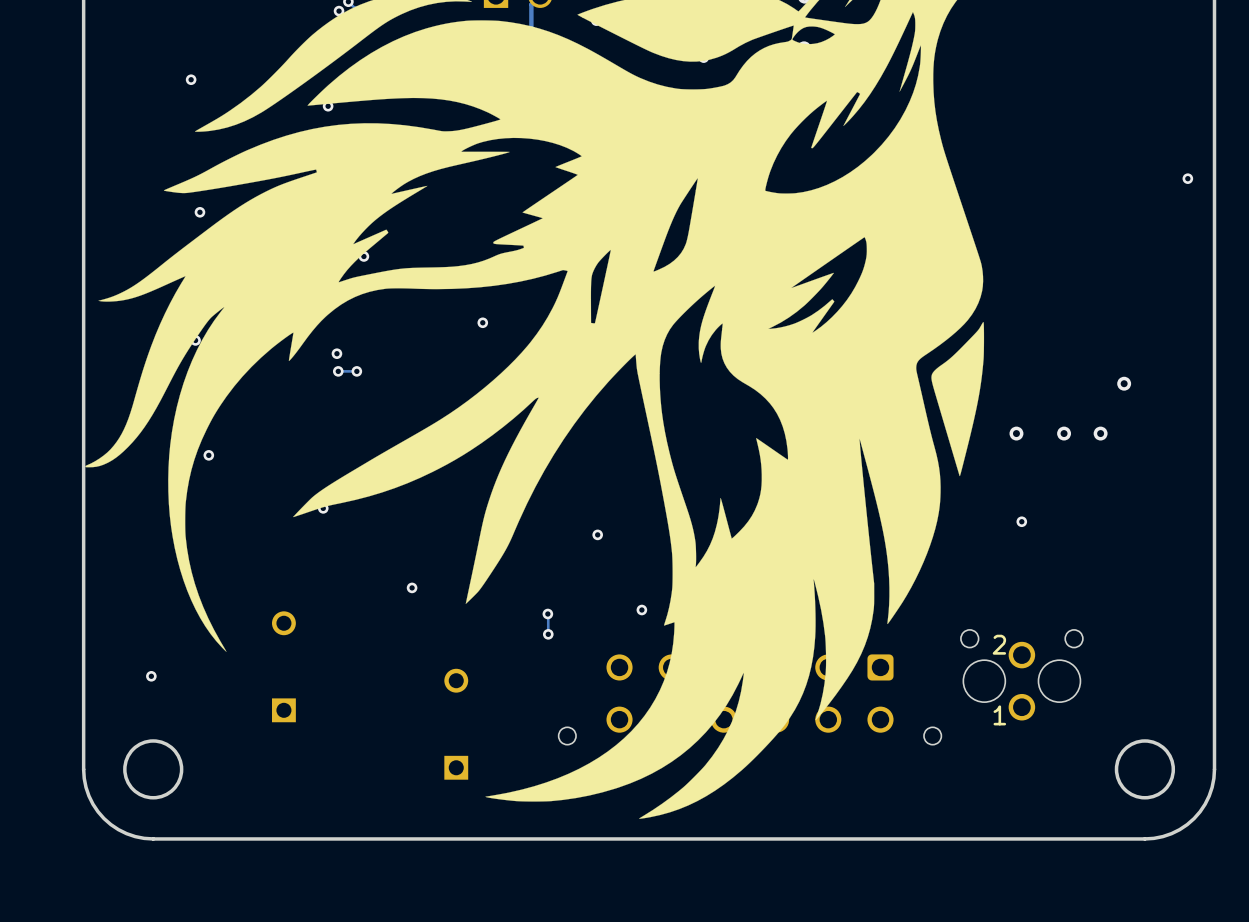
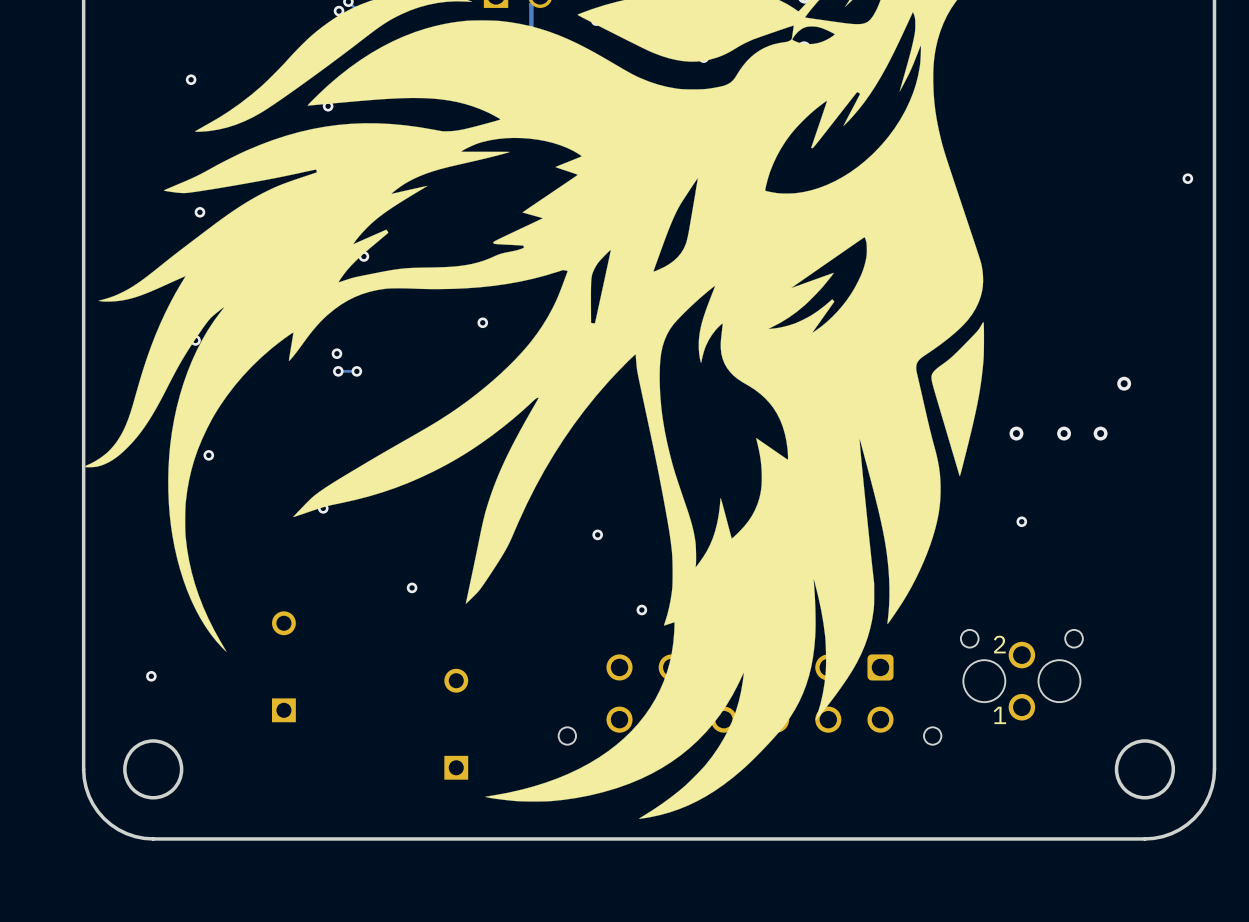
track: (547, 614) (548, 634) -> none
via: (547, 614) -> none
via: (548, 634) -> none

